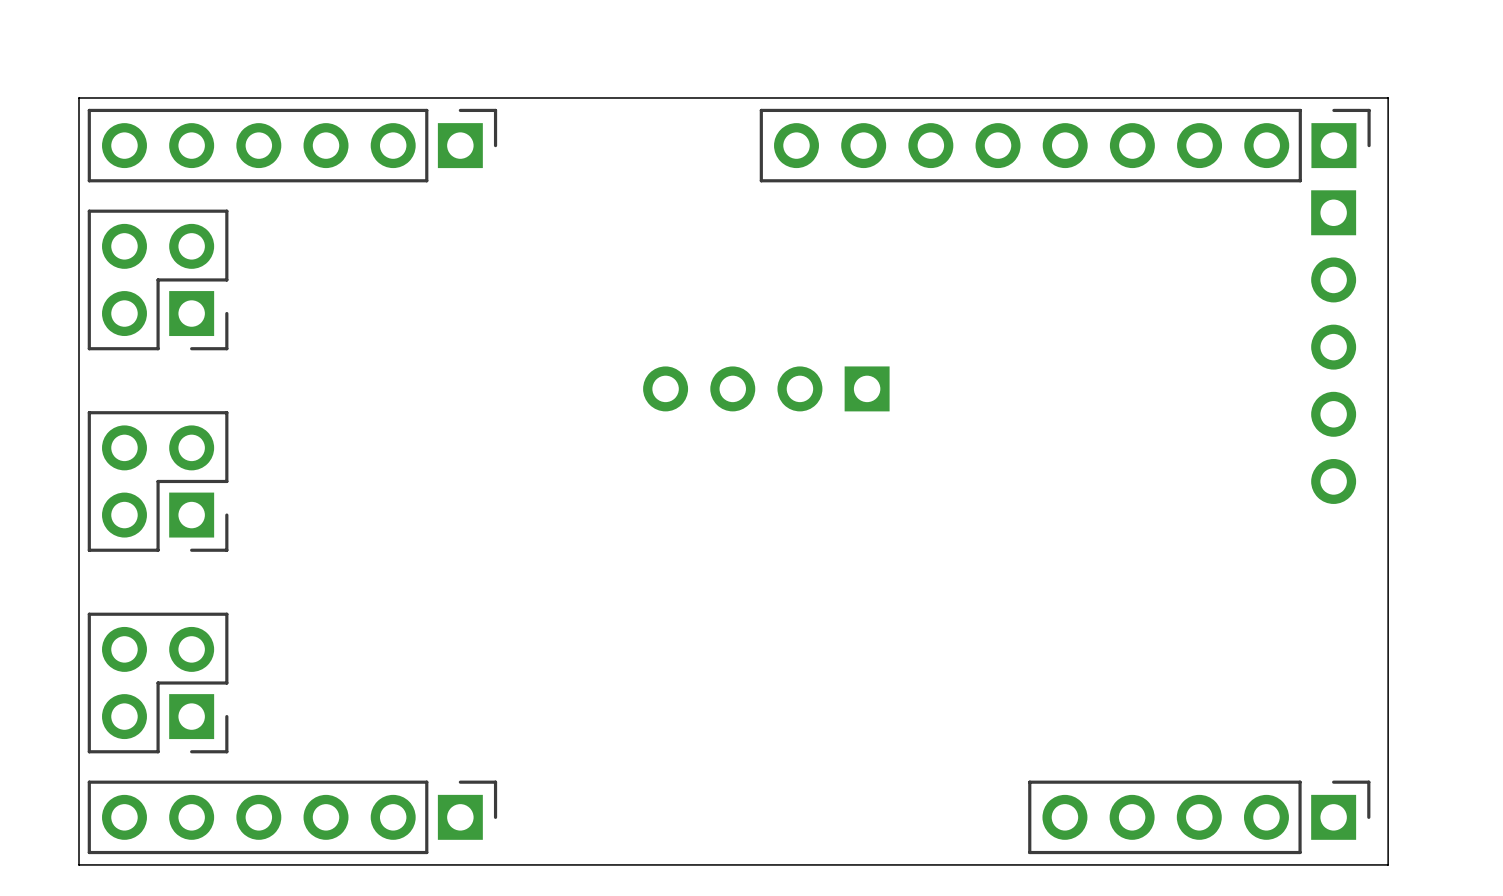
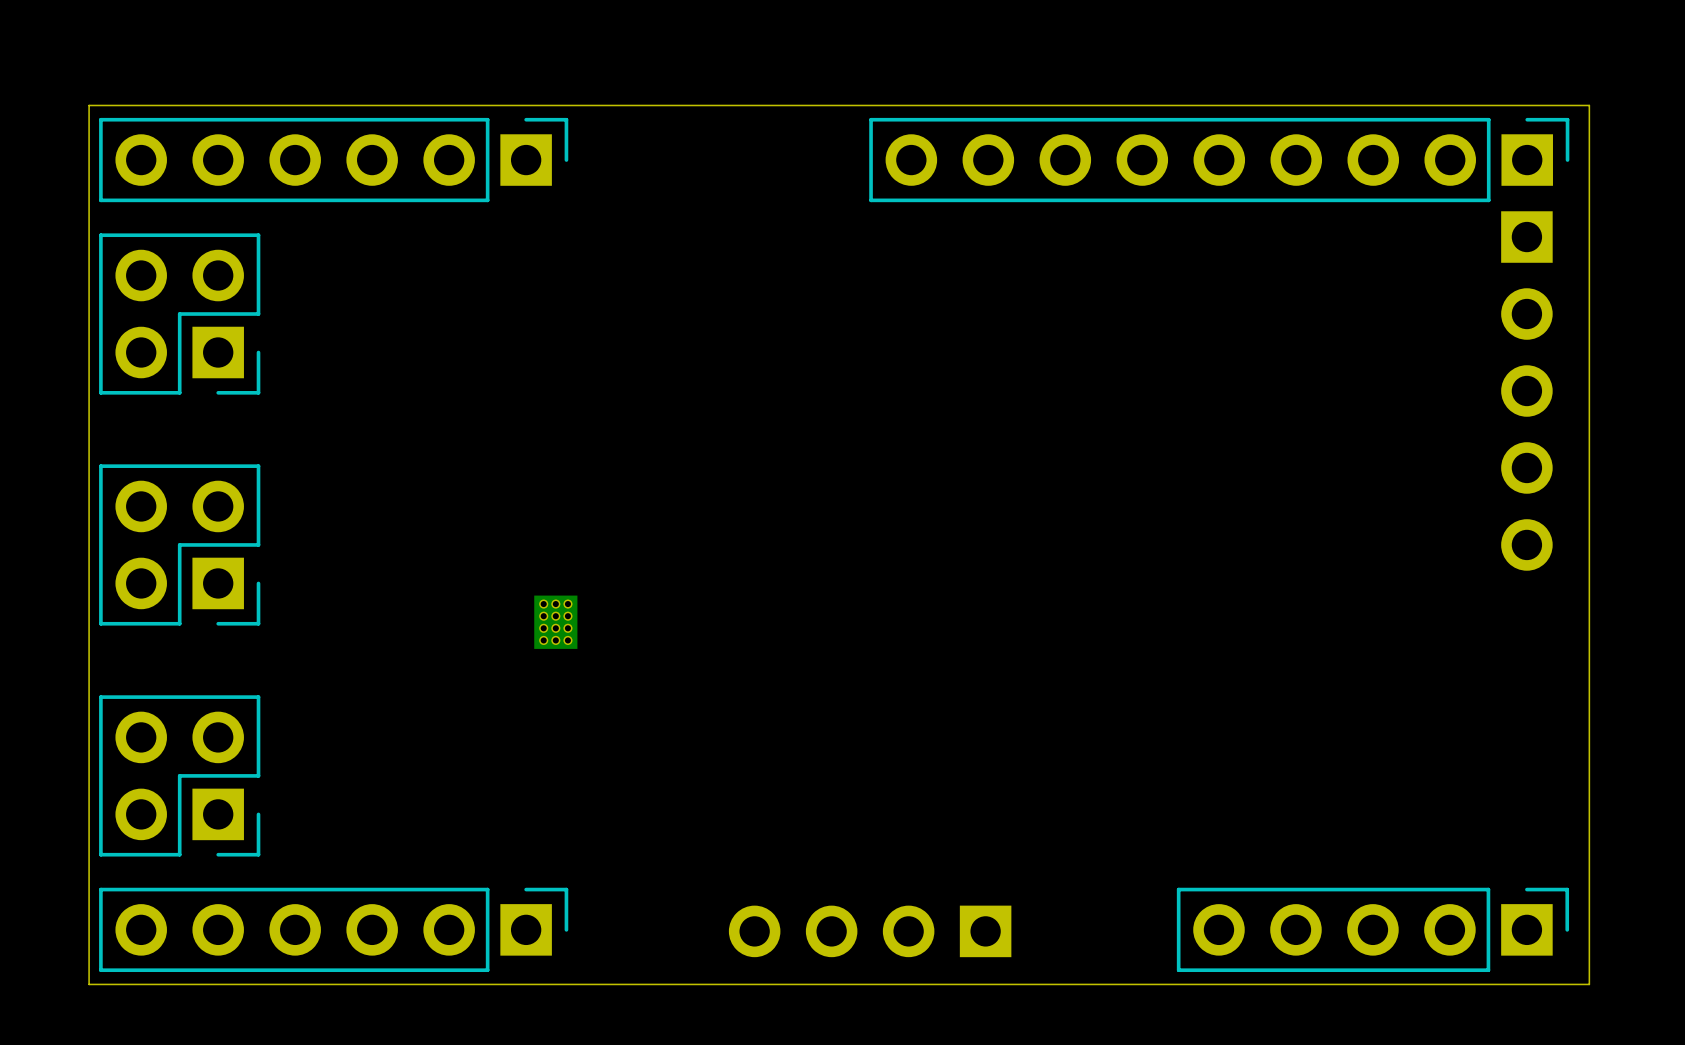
part position: (766, 388) -> (870, 931)
part: none -> (555, 622)

